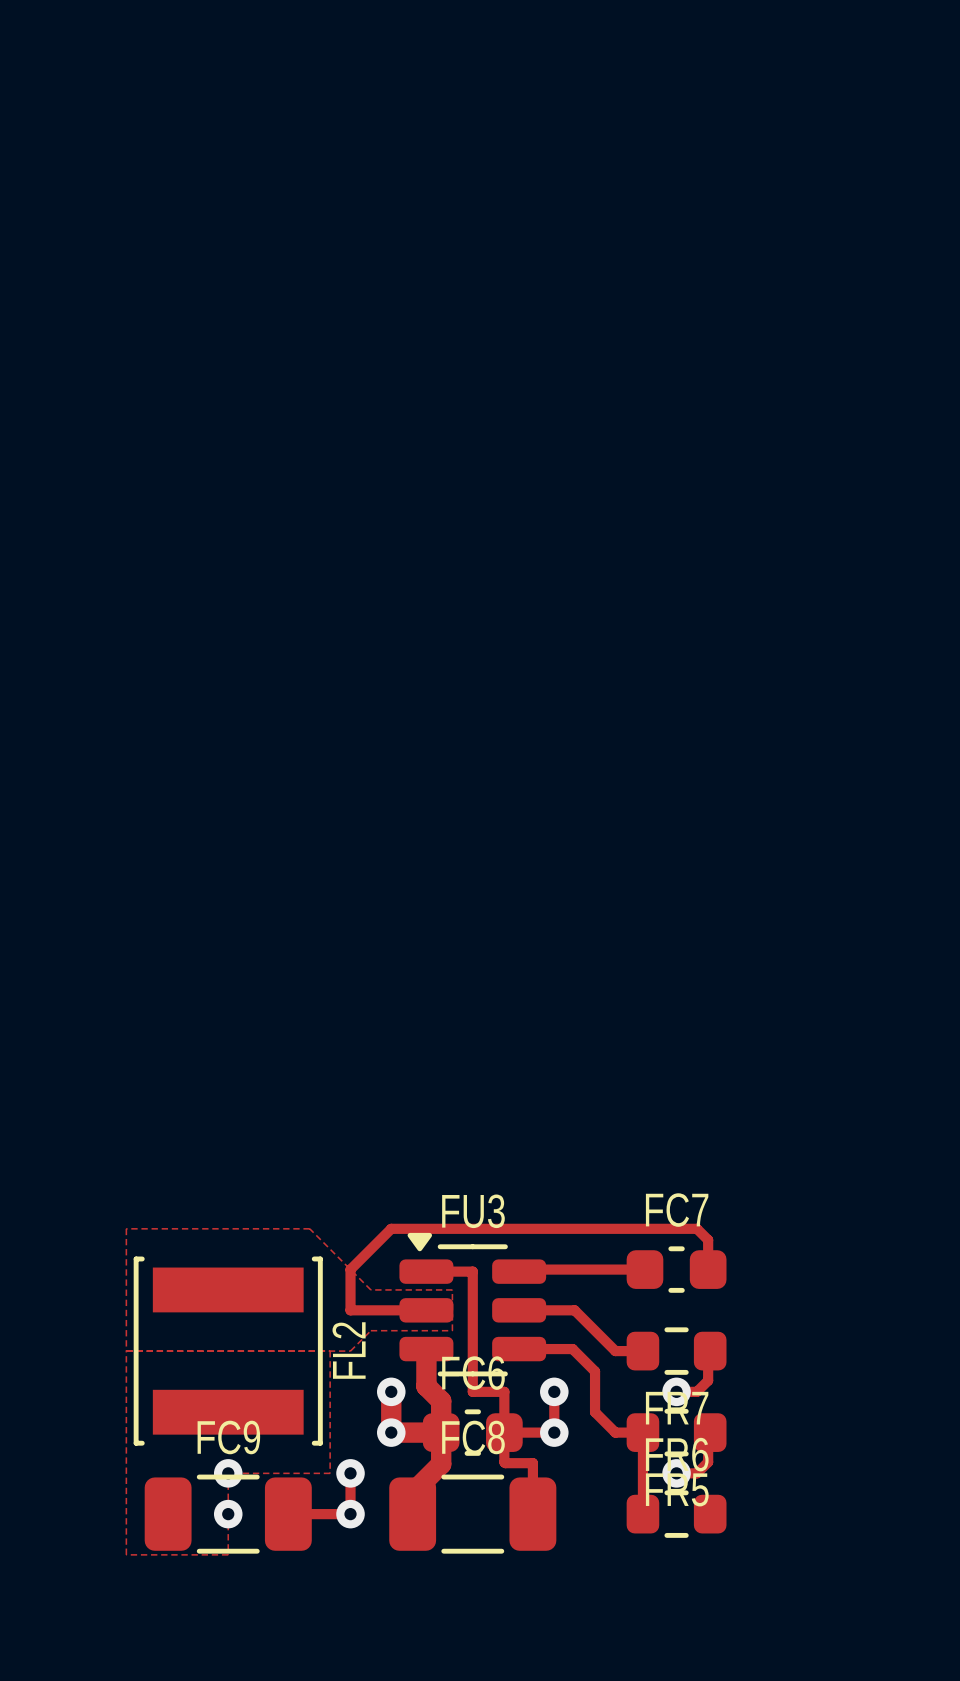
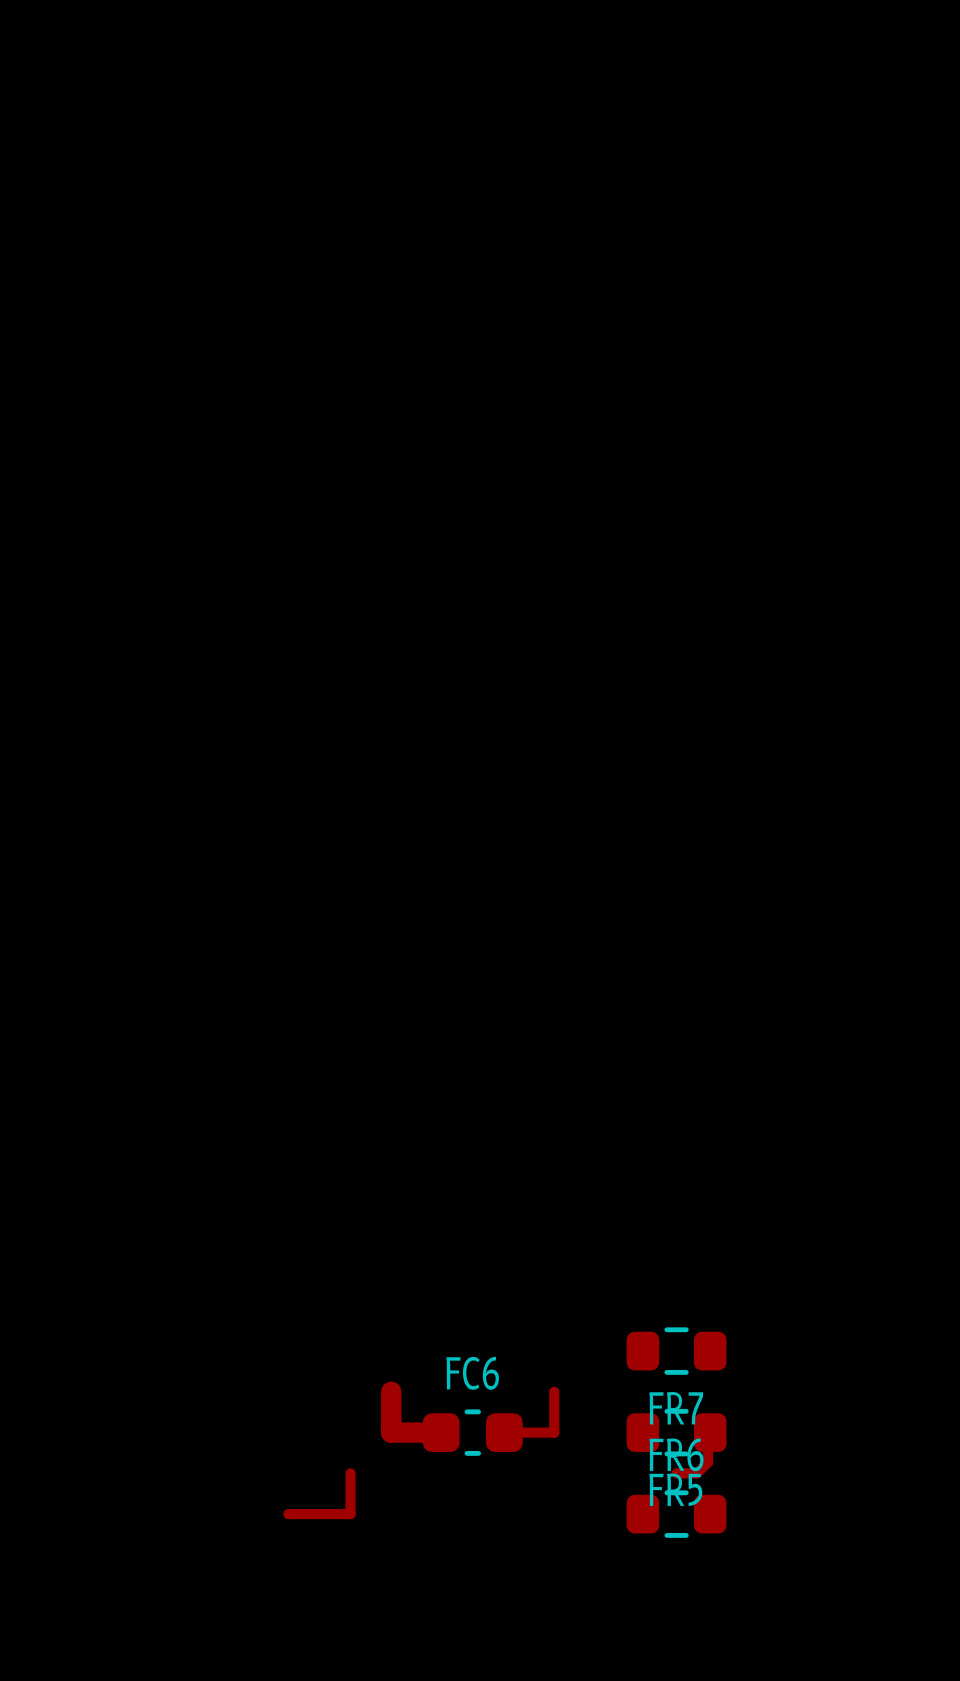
top track: (521, 1269) (644, 1269) -> none
FC7: (676, 1269) -> none
top track: (708, 1269) (708, 1240) (696, 1228) (391, 1228) (350, 1269) (350, 1310) (426, 1310) -> none
top track: (426, 1271) (472, 1271) (472, 1391) (504, 1391) (504, 1462) (532, 1463) (532, 1514) -> none
FU3: (472, 1304) -> none
top track: (519, 1310) (574, 1310) (615, 1351) (642, 1351) -> none
top track: (426, 1349) (426, 1386) (441, 1401) (441, 1464) (412, 1492) -> none
top track: (519, 1349) (572, 1349) (595, 1371) (595, 1412) (615, 1432) (642, 1432) (642, 1514) -> none
top zone outline: (126, 1351) (350, 1351) (370, 1330) (452, 1330) (452, 1289) (370, 1289) (309, 1228) (126, 1228) (126, 1554) (228, 1554) (228, 1473) (330, 1473) (330, 1351) -> none
FL2: (228, 1351) -> none
top track: (708, 1351) (708, 1380) (696, 1391) (676, 1391) -> none
via: (391, 1391) -> none
via: (554, 1391) -> none
via: (676, 1391) -> none
via: (391, 1432) -> none
via: (554, 1432) -> none
via: (228, 1473) -> none
via: (350, 1473) -> none
via: (676, 1473) -> none
FC9: (228, 1514) -> none
via: (228, 1514) -> none
via: (350, 1514) -> none
FC8: (472, 1514) -> none

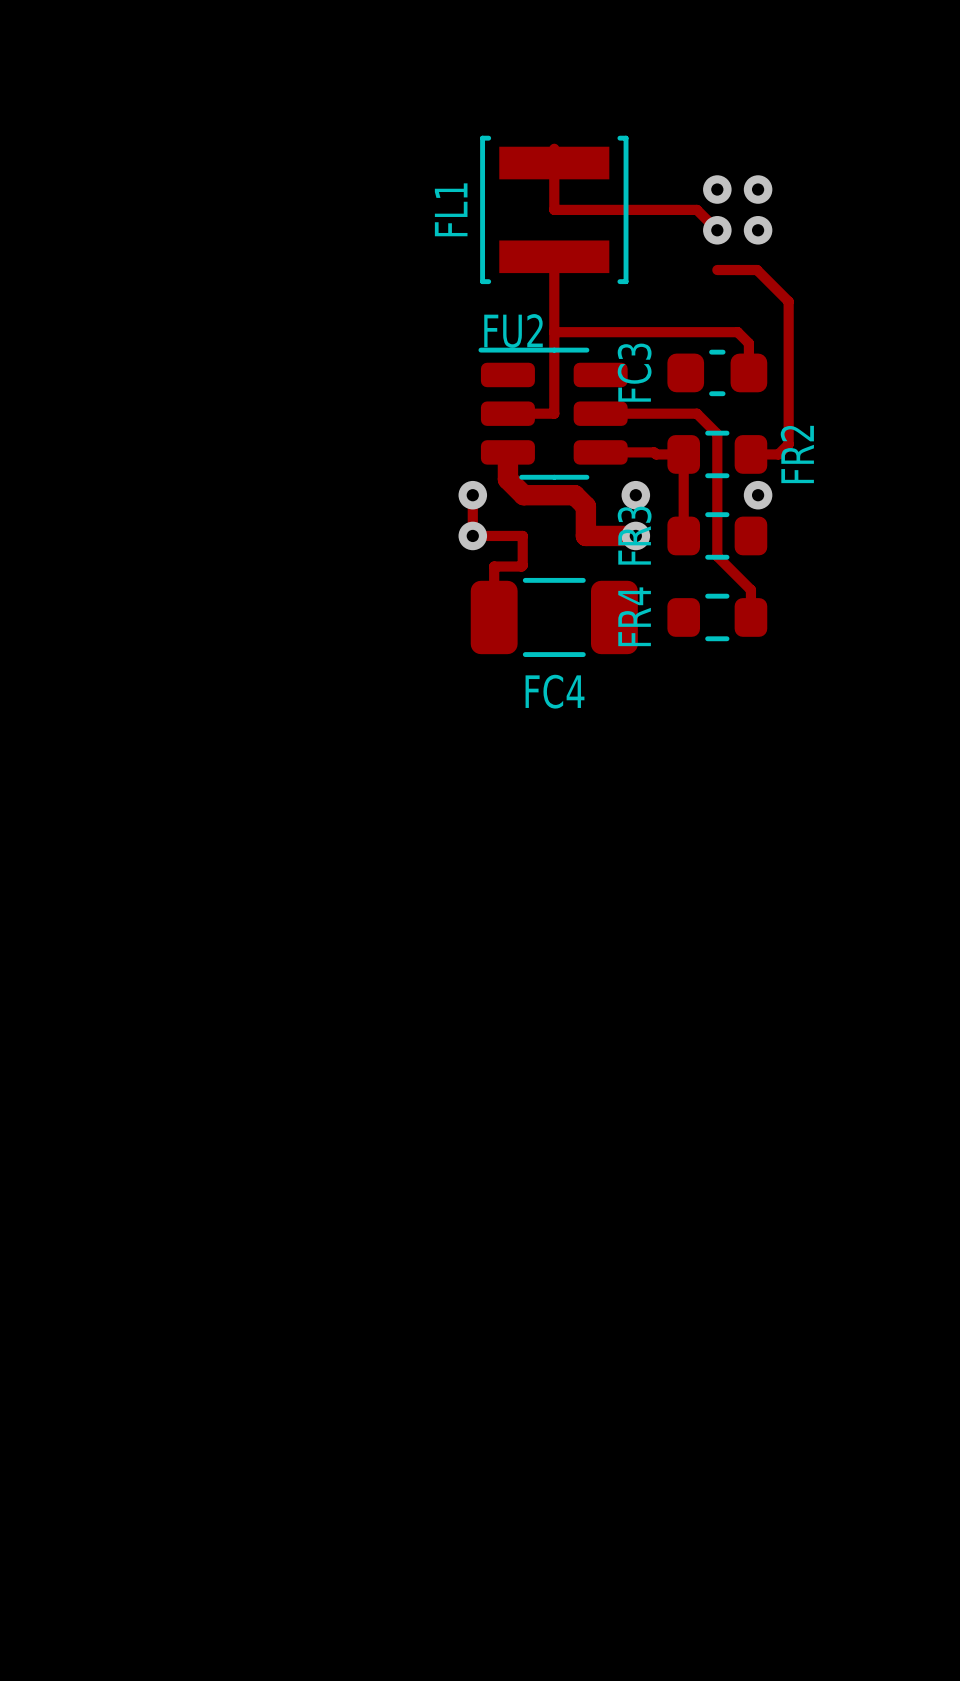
top track: none -> (554, 148) (554, 209) (696, 209) (717, 230)
via: none -> (717, 189)
via: none -> (758, 189)
FL1: none -> (554, 209)
via: none -> (717, 230)
via: none -> (758, 230)
top track: none -> (717, 270) (757, 270) (788, 301) (788, 444) (778, 454) (750, 454)
top track: none -> (554, 271) (554, 413) (507, 413)
top track: none -> (554, 332) (737, 332) (748, 343) (748, 372)
FC3: none -> (717, 372)
FU2: none -> (553, 413)
top track: none -> (600, 413) (696, 413) (717, 434) (717, 556) (750, 589) (750, 617)
top track: none -> (507, 452) (507, 479) (523, 495) (574, 495) (585, 506) (585, 535) (635, 535)
top track: none -> (600, 452) (683, 454) (683, 535)
FR2: none -> (717, 454)
top track: none -> (472, 495) (472, 535) (522, 535) (522, 565) (494, 566) (494, 617)
via: none -> (472, 495)
via: none -> (635, 495)
via: none -> (758, 495)
via: none -> (472, 535)
via: none -> (635, 535)
FR3: none -> (717, 535)
FC4: none -> (554, 617)
FR4: none -> (717, 617)
FR7: (676, 1351) -> none
top track: (391, 1391) (391, 1432) (441, 1432) -> none
top track: (554, 1391) (554, 1432) (504, 1432) -> none
FC6: (472, 1432) -> none
FR5: (676, 1432) -> none
top track: (708, 1432) (708, 1462) (696, 1473) (676, 1473) -> none
top track: (350, 1473) (350, 1514) (288, 1514) -> none
FR6: (676, 1514) -> none

